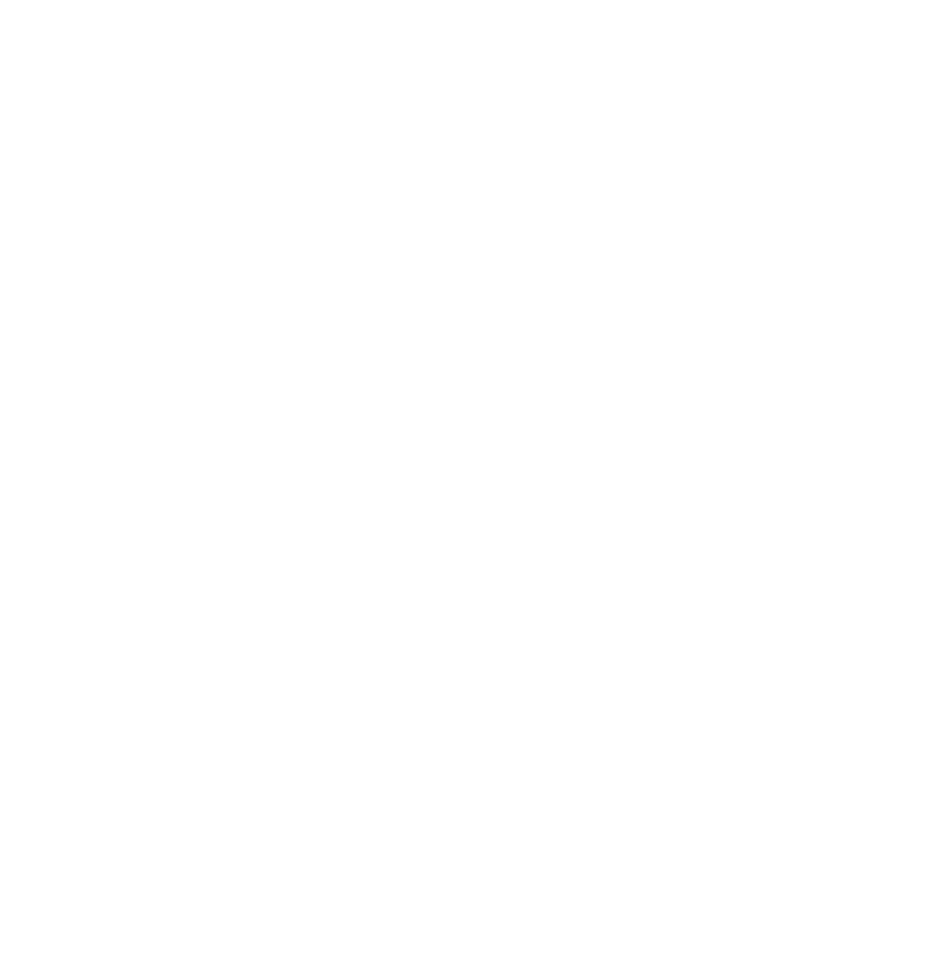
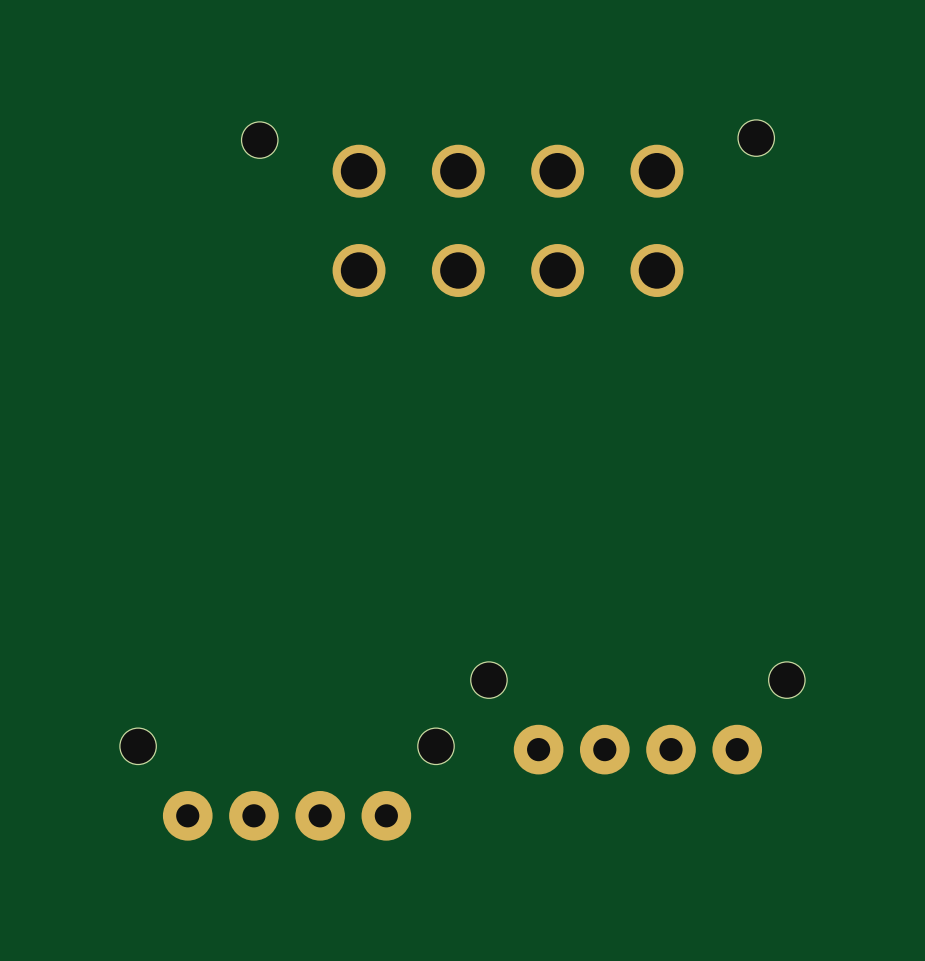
part: none -> (507, 208)
part: none -> (637, 718)
part: none -> (287, 784)

